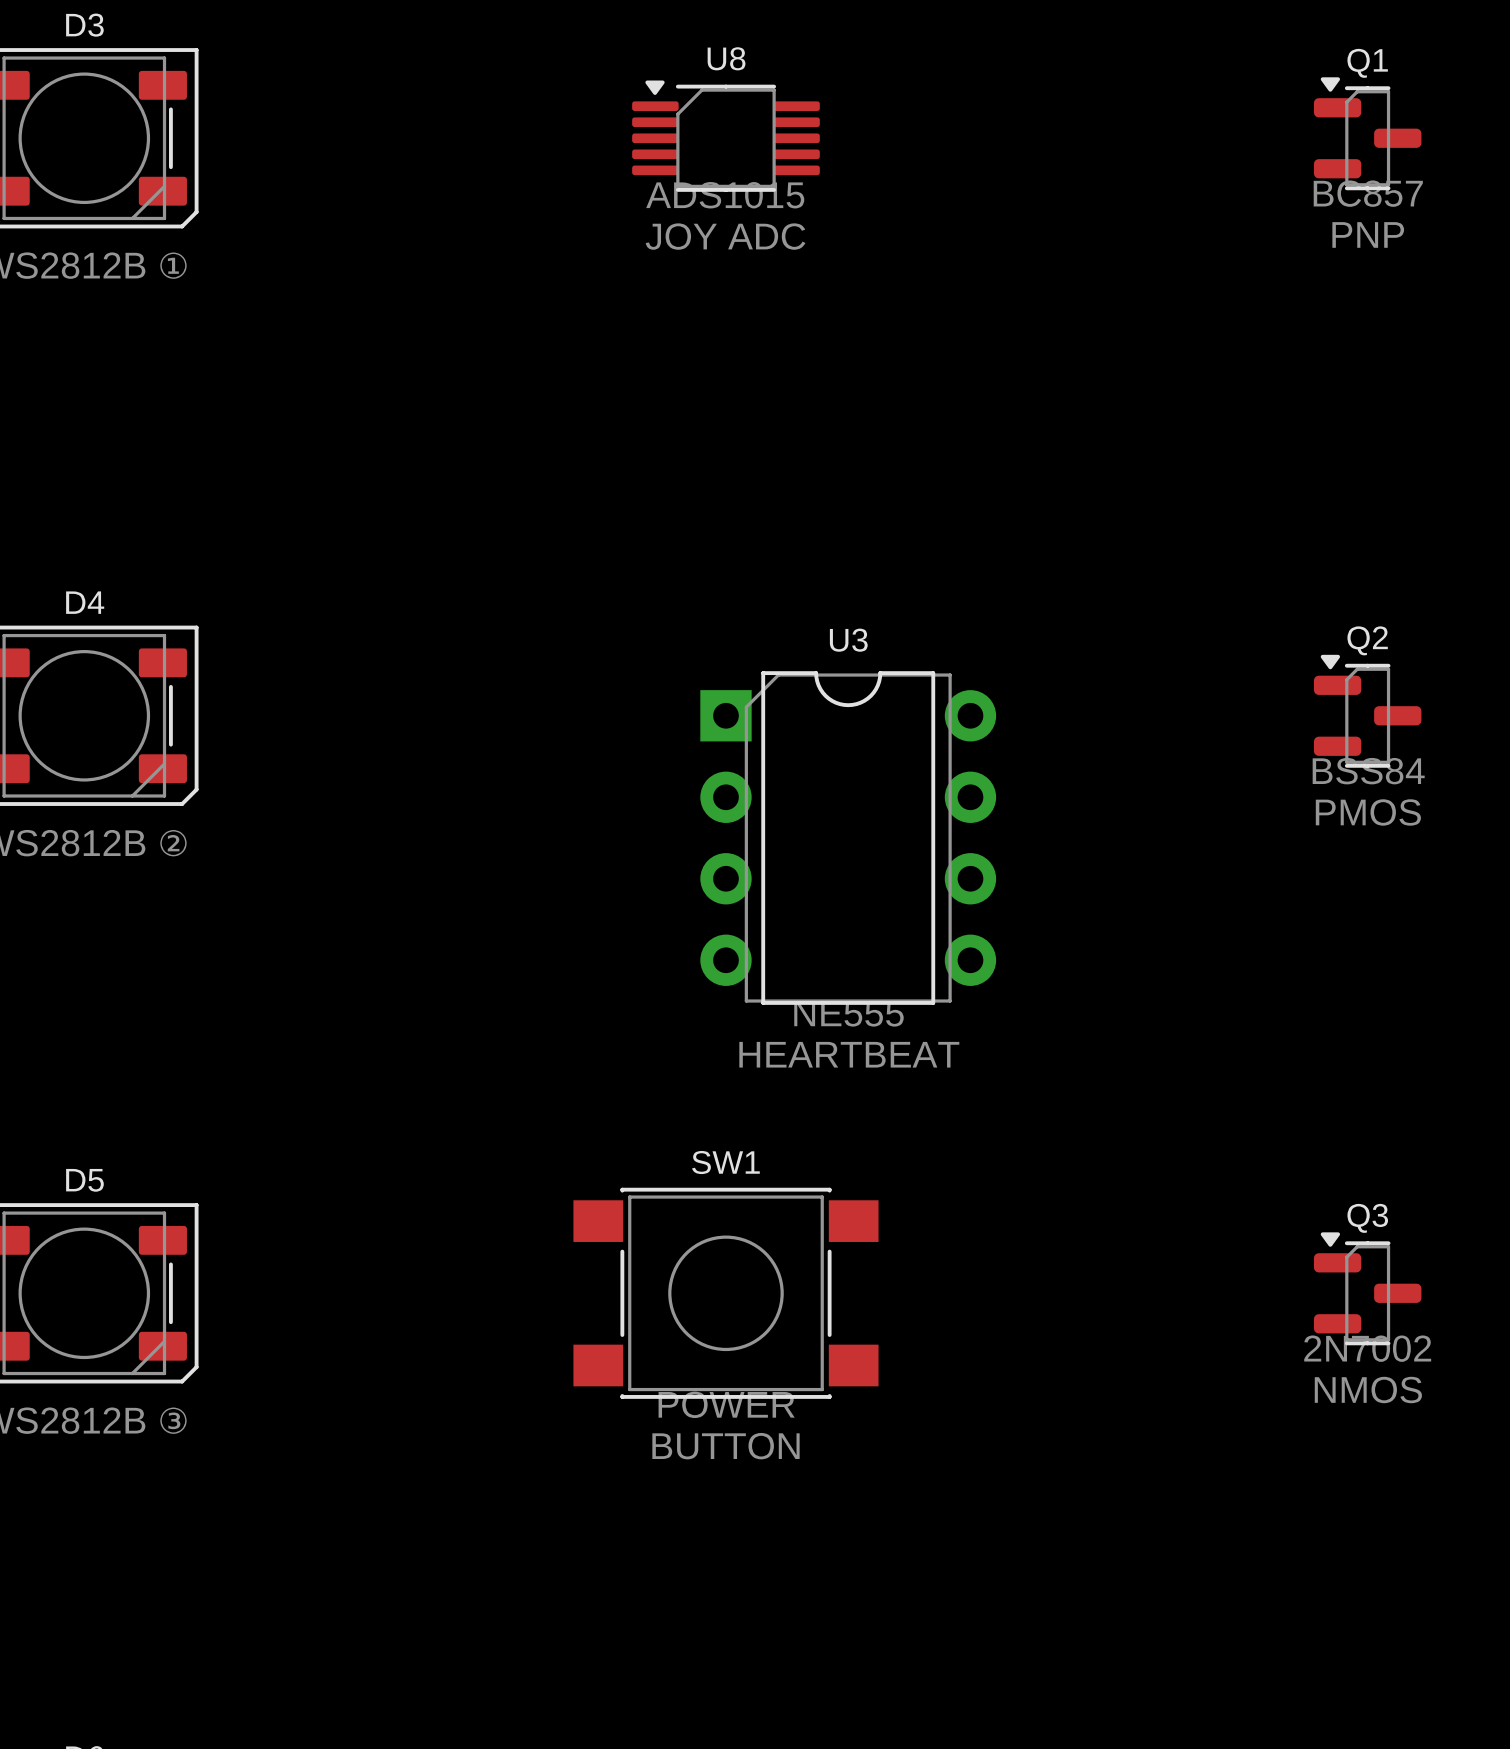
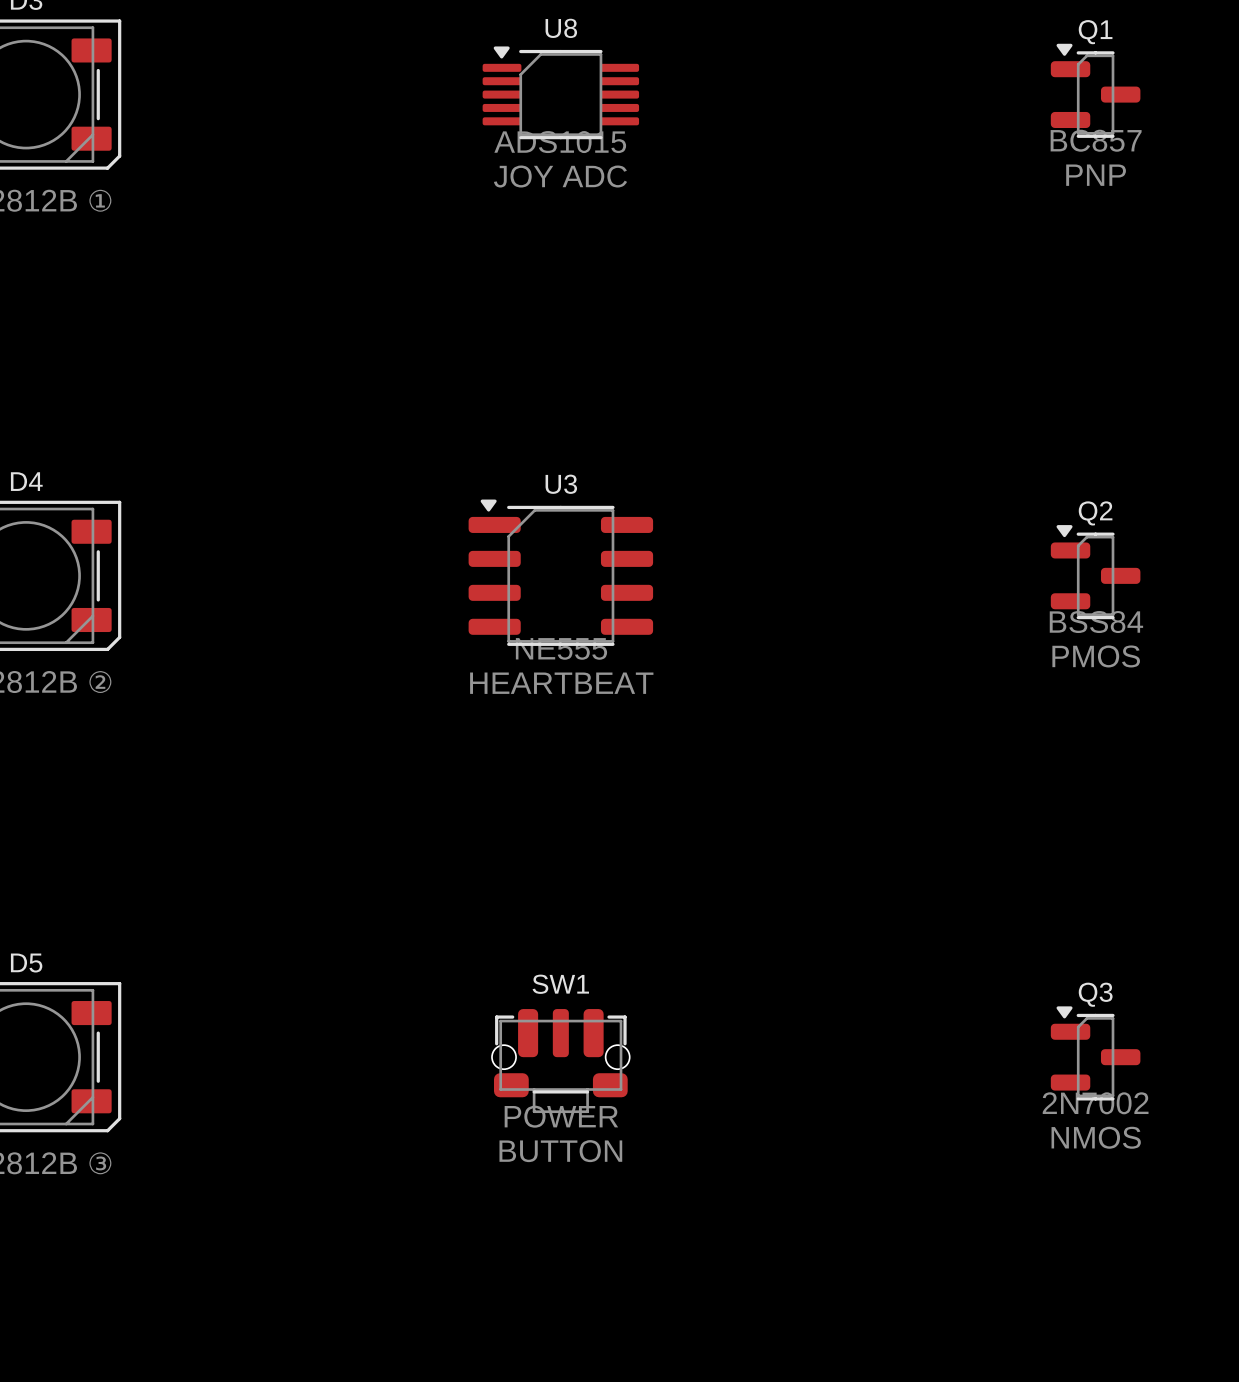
U3 name position: U3 (848, 640) -> U3 (561, 484)
U3 footprint: [700, 671, 997, 1005] -> [468, 499, 654, 646]
SW1 footprint: [573, 1187, 879, 1399] -> [491, 1009, 630, 1114]

